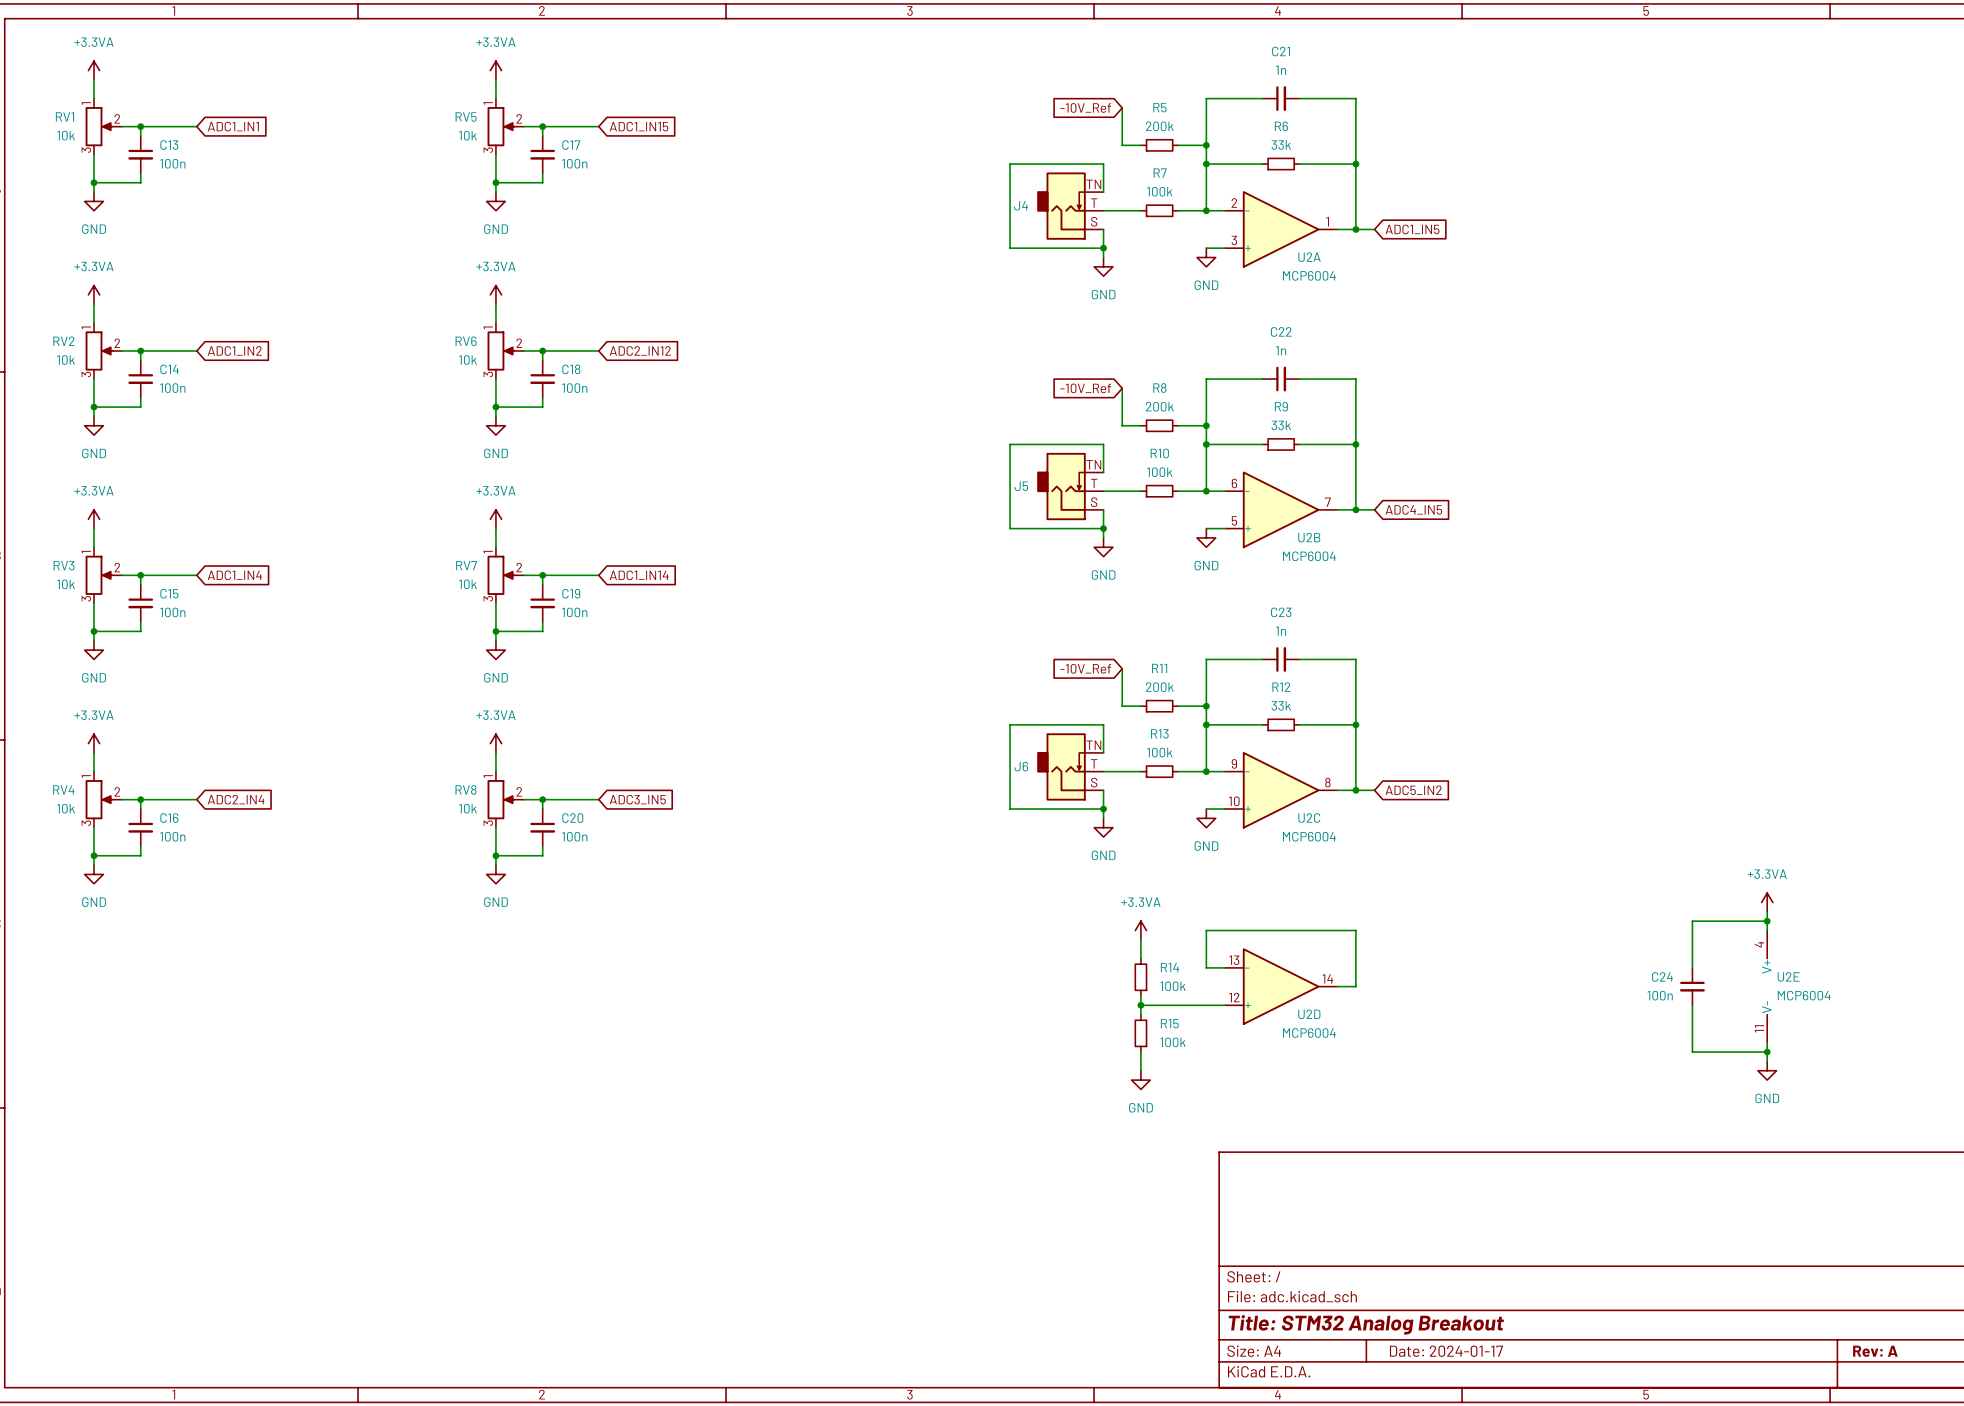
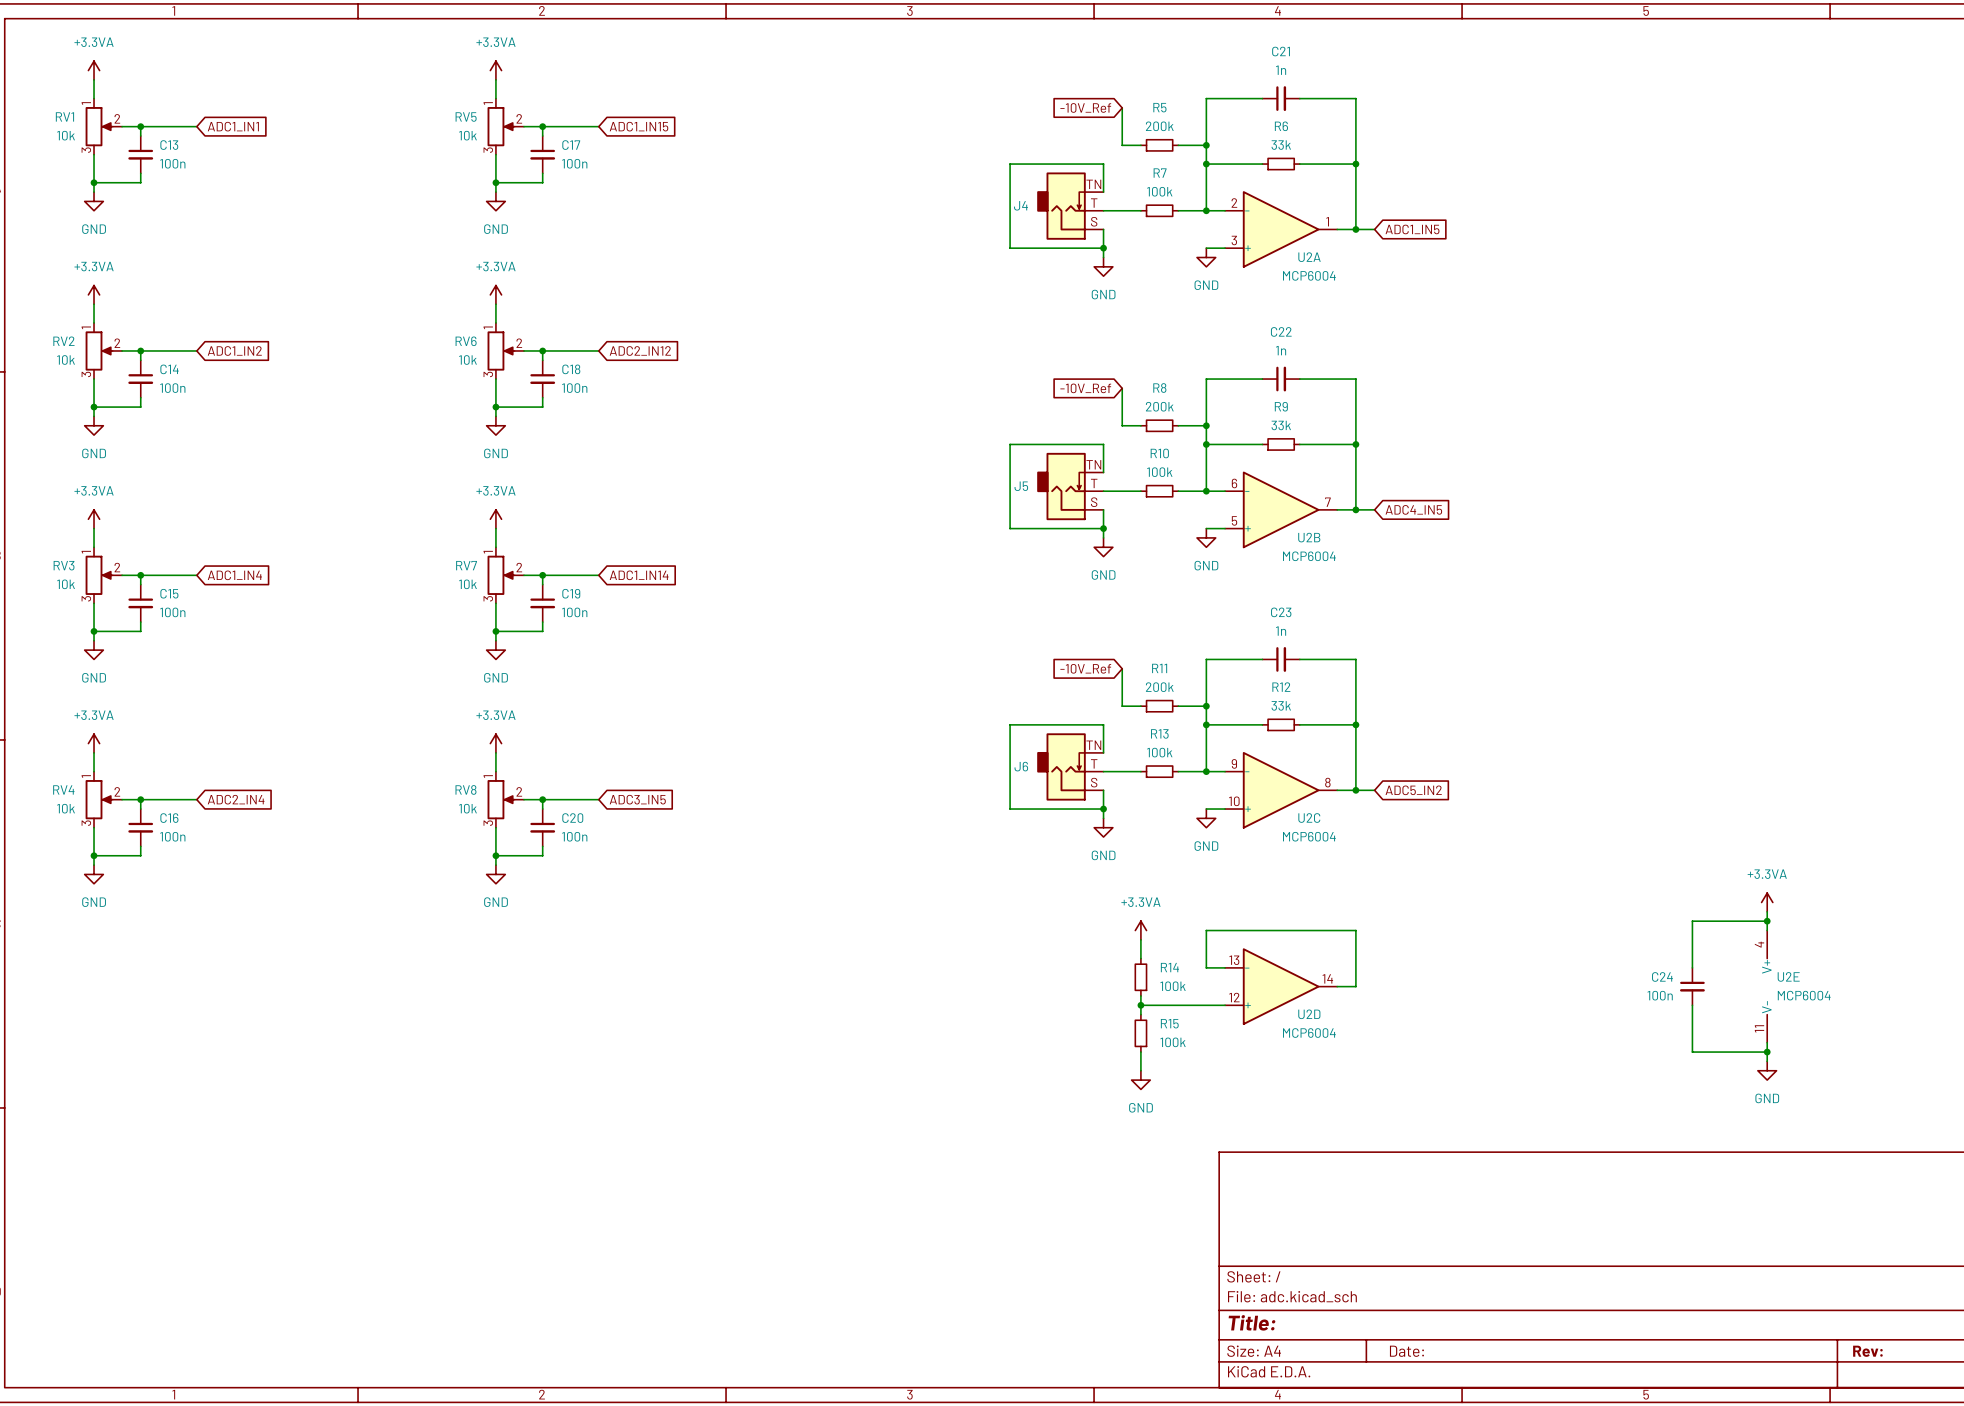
title block: Title: STM32 Analog Breakout (1366, 1324) -> Title: (1252, 1322)
title block: Date: 2024-01-17 (1446, 1351) -> Date: (1406, 1351)
title block: Rev: A (1875, 1351) -> Rev: (1867, 1351)

